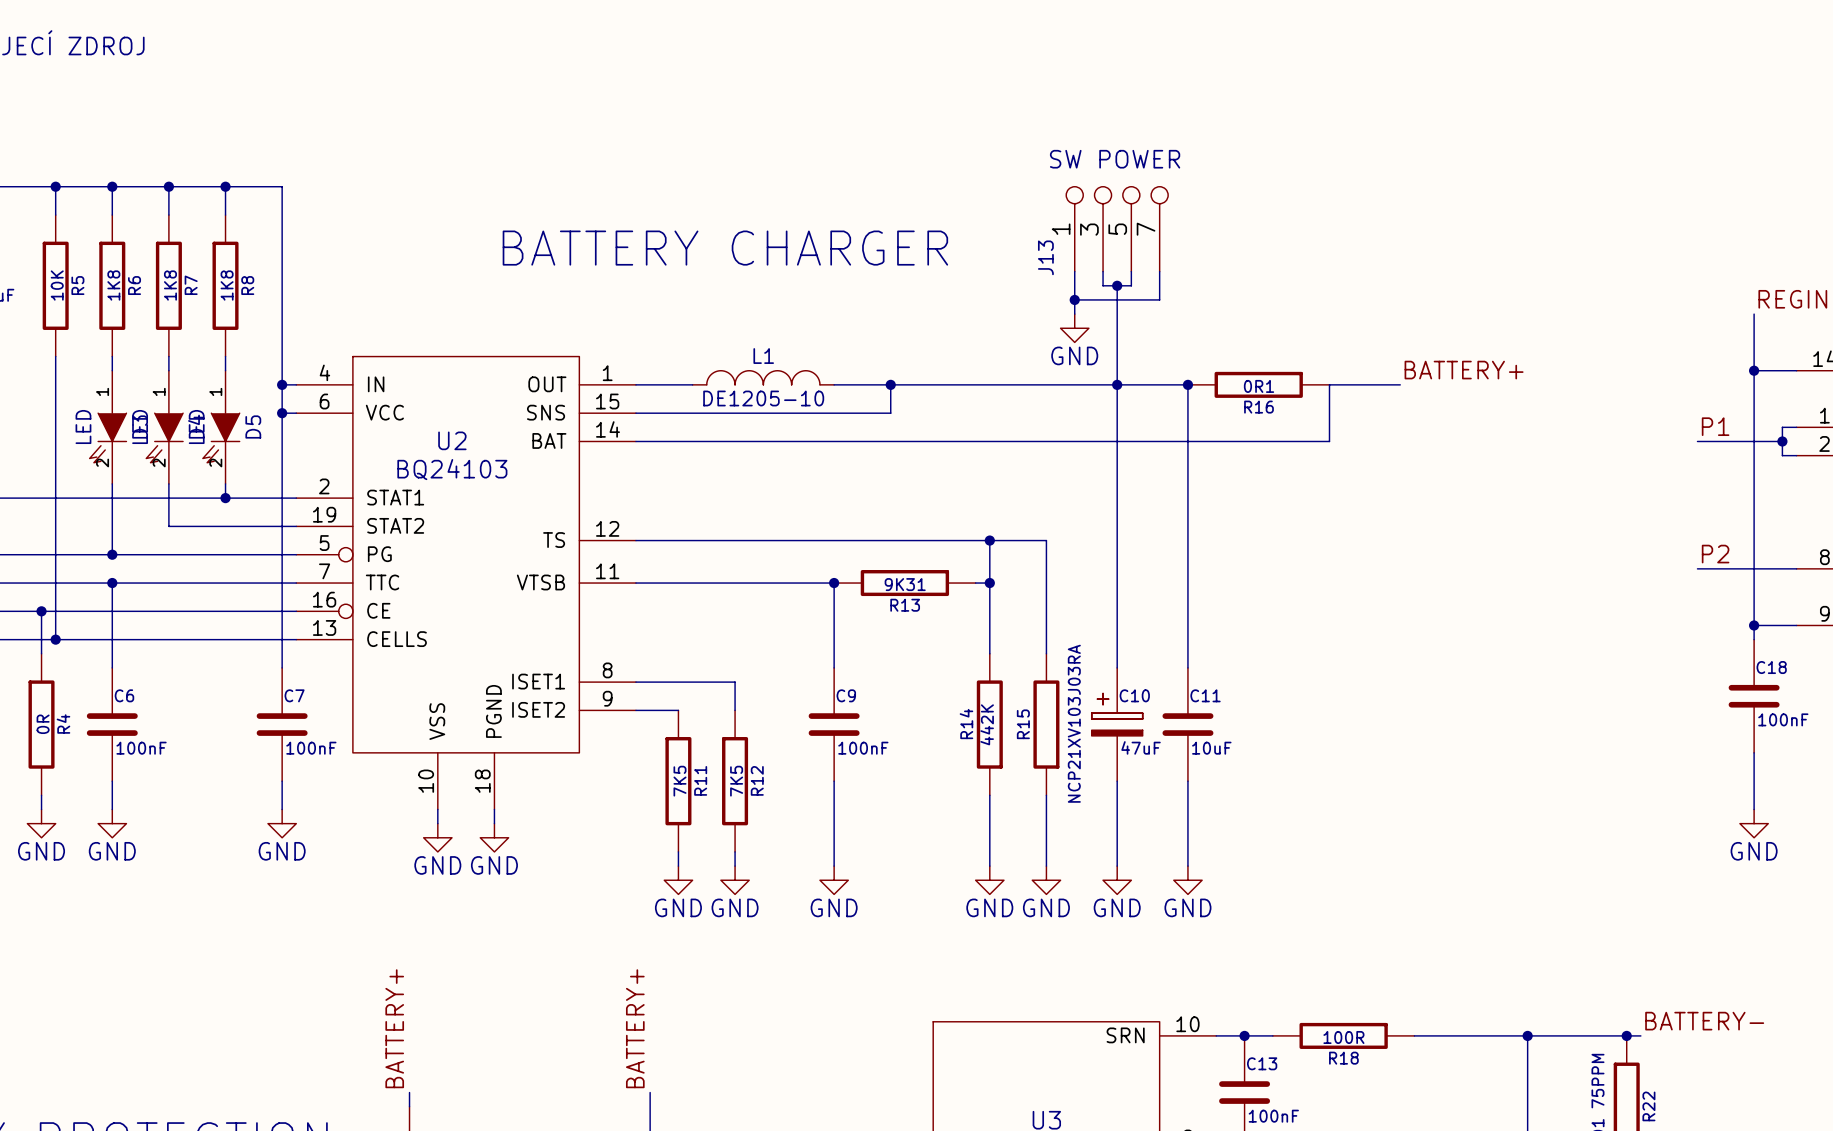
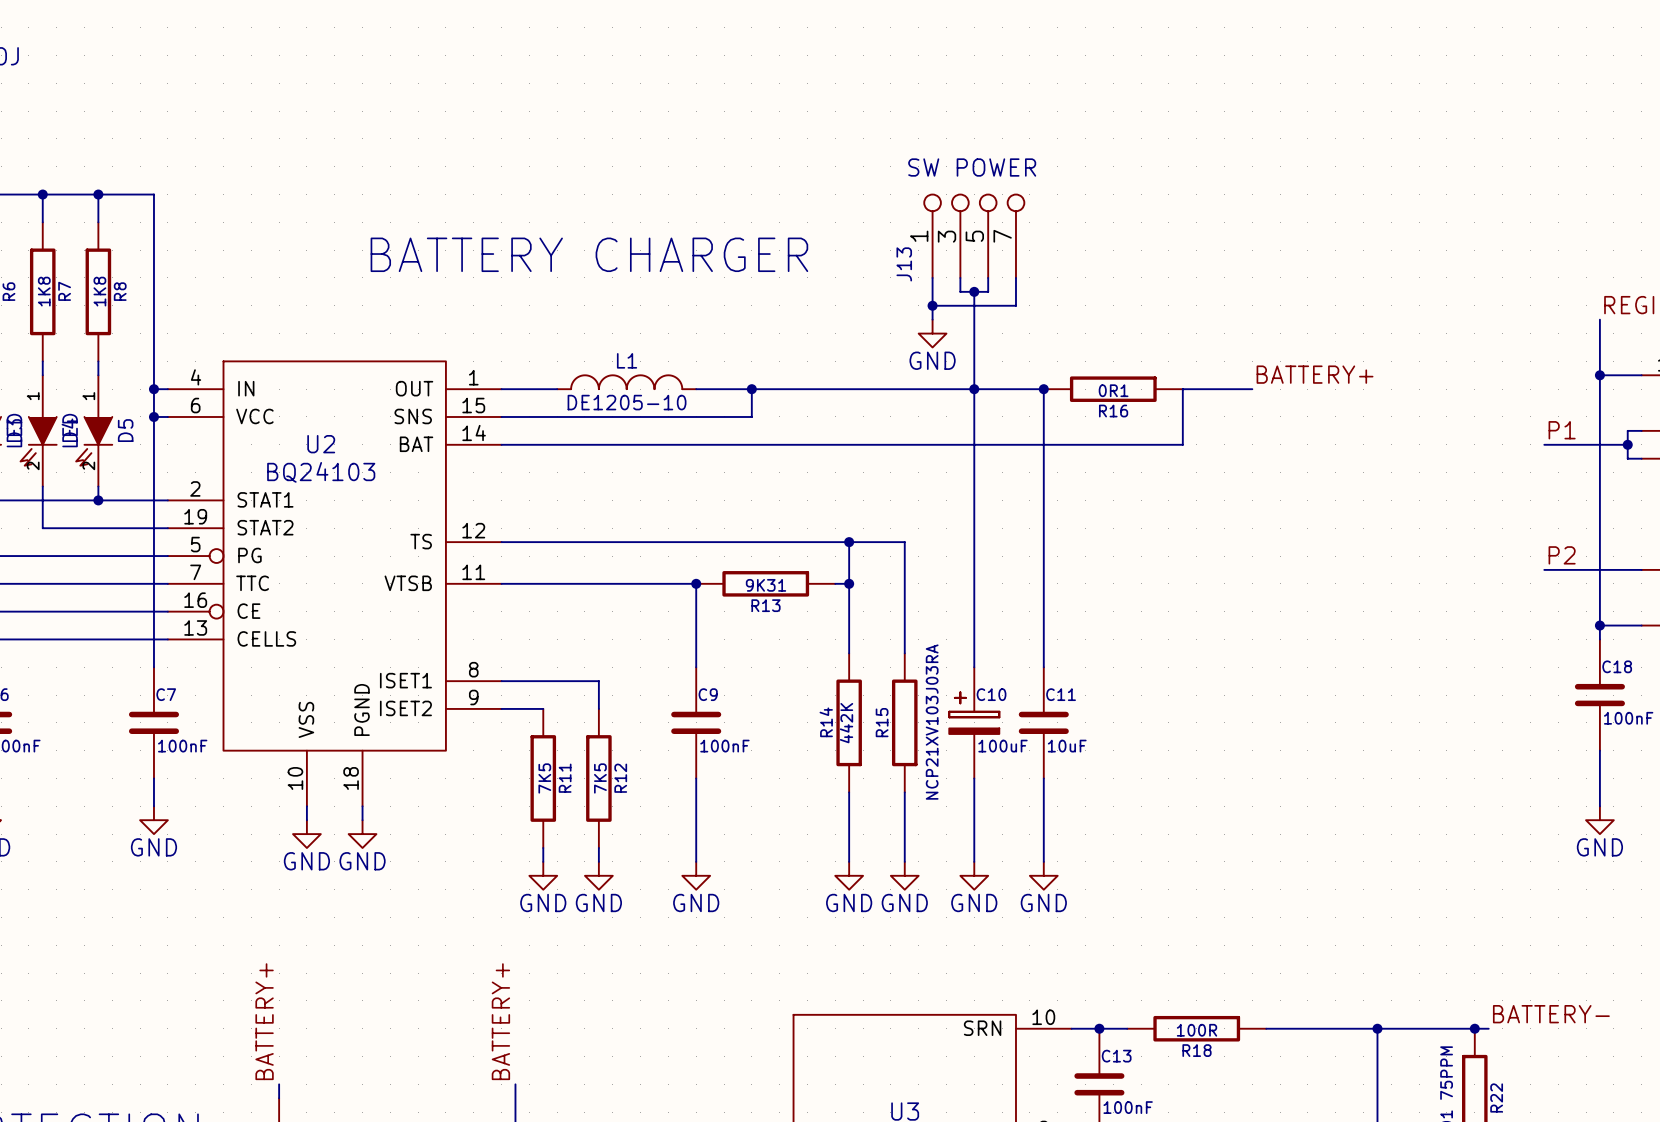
C10 value: 47uF (1141, 747) -> 100uF (1003, 746)

